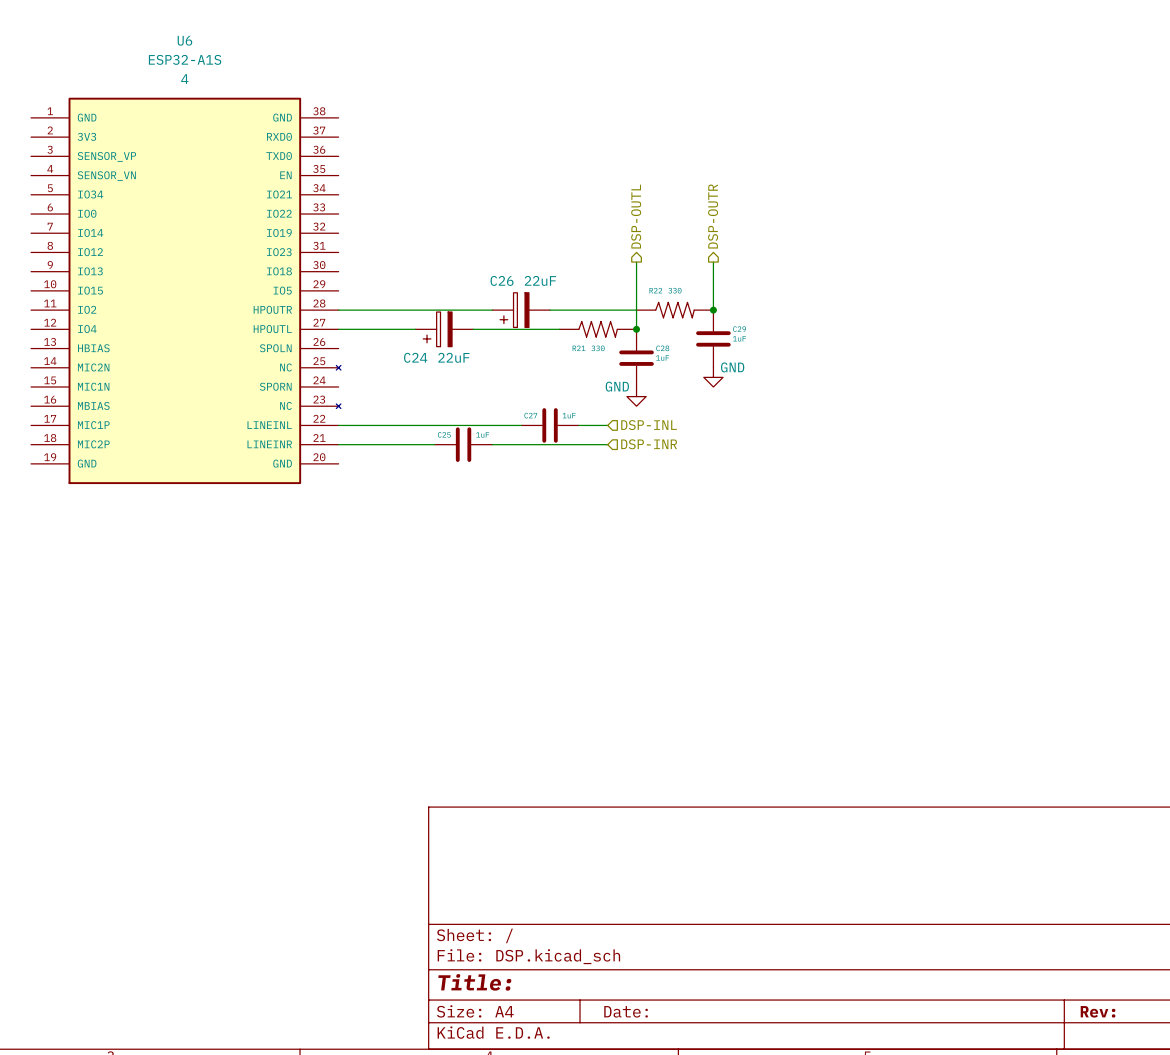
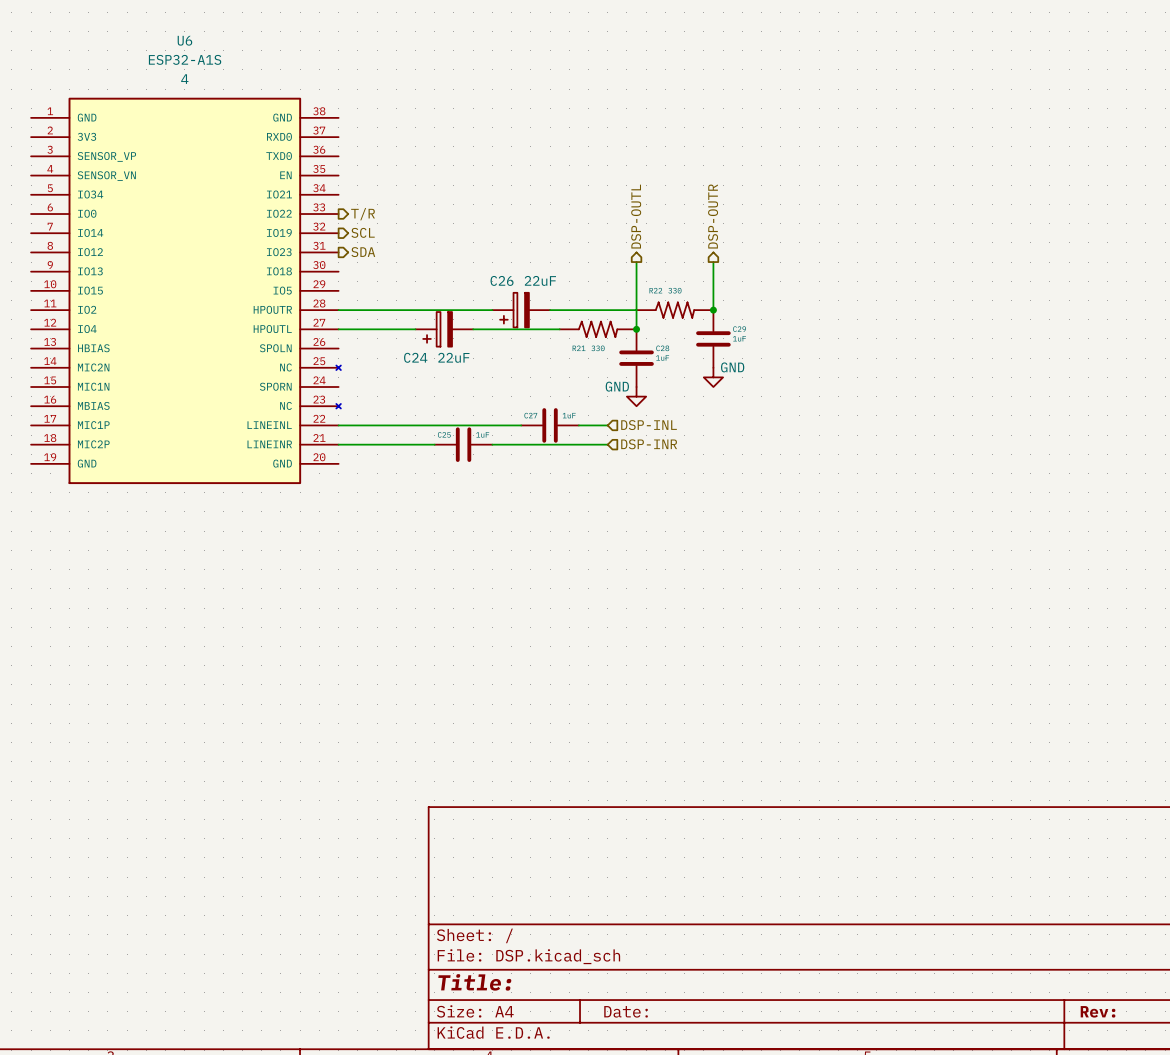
hierarchical label: none -> T/R (363, 214)
hierarchical label: none -> SCL (363, 232)
hierarchical label: none -> SDA (363, 252)

